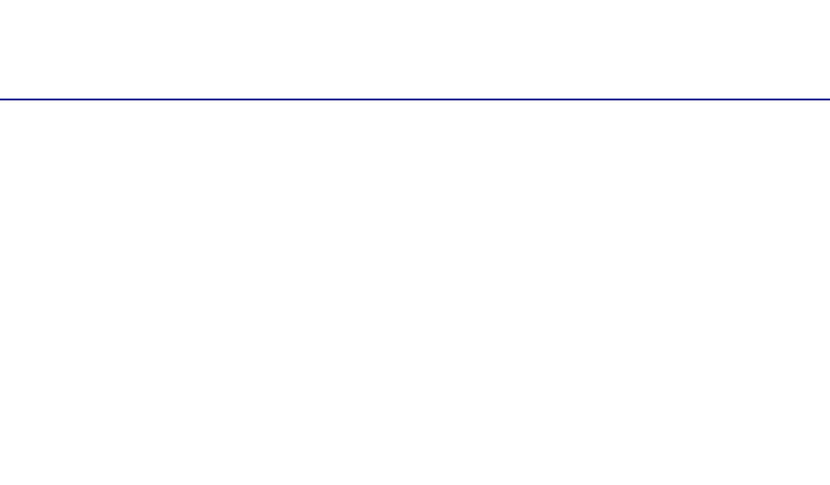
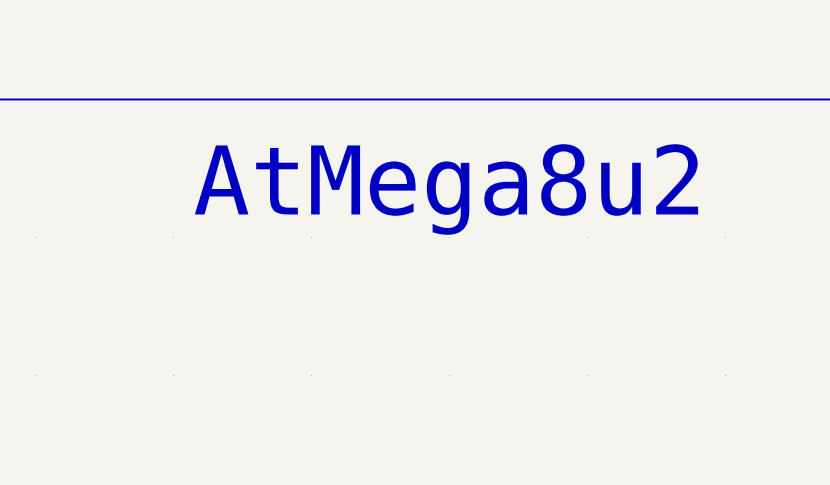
text: none -> AtMega8u2 (446, 189)

